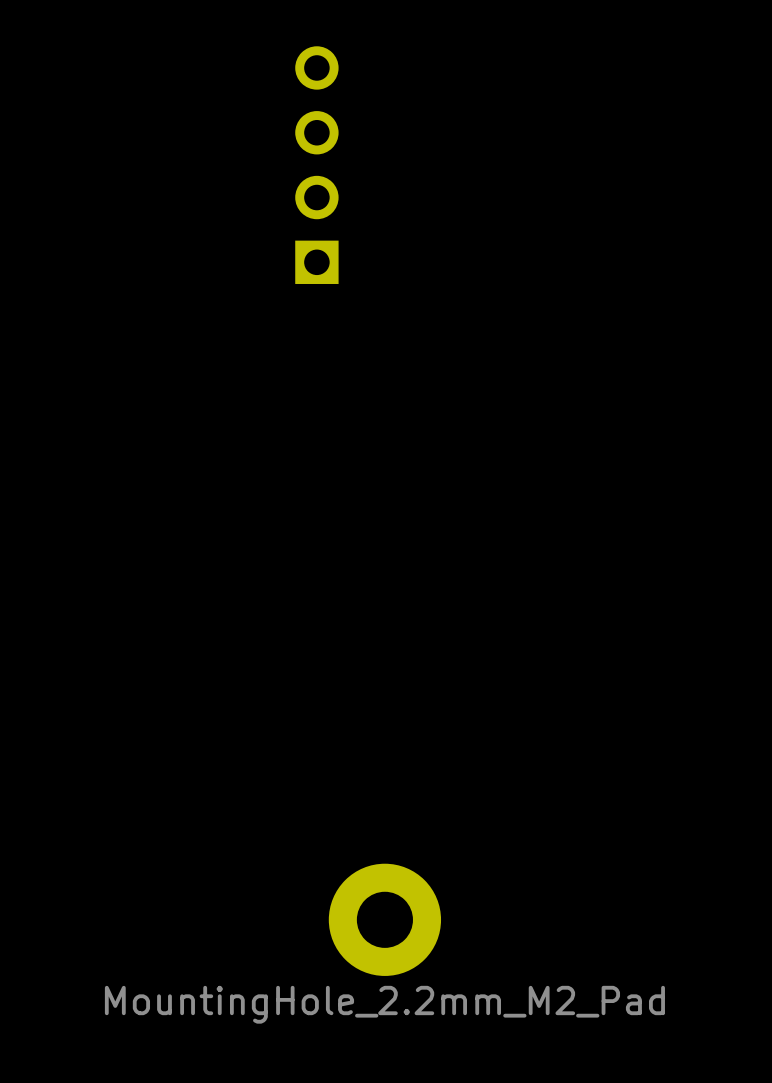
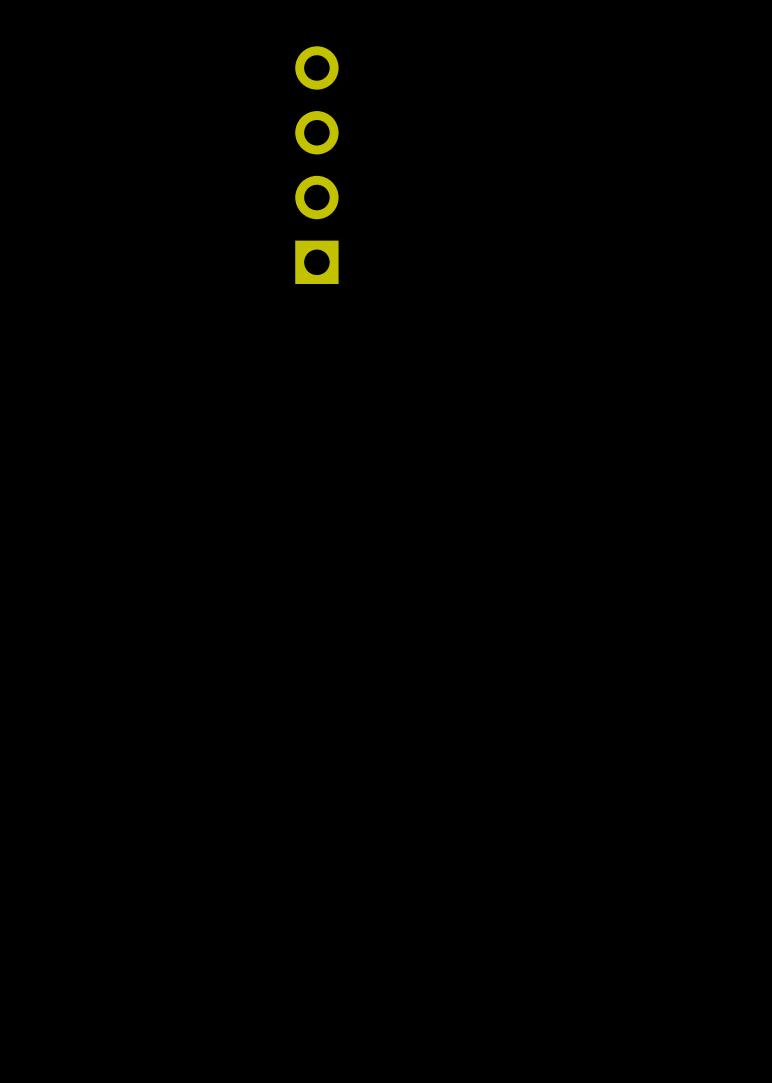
part: MountingHole_2.2mm_M2_Pad (384, 919) -> none

